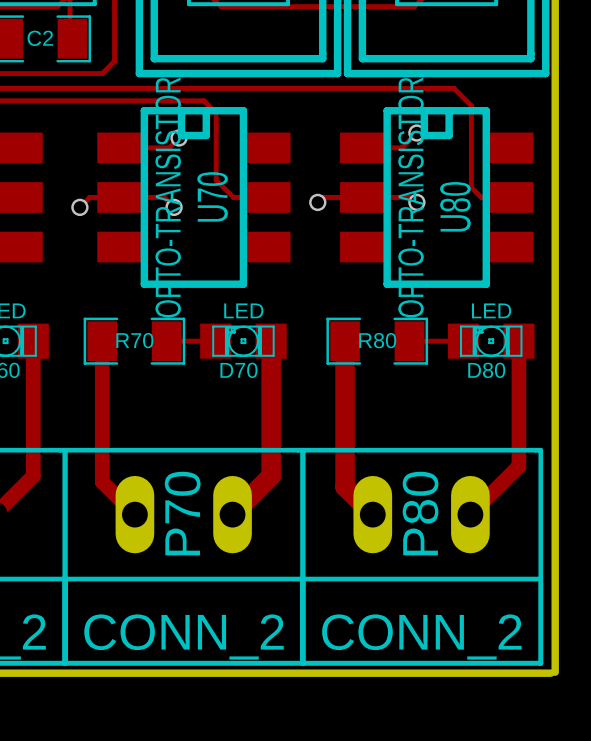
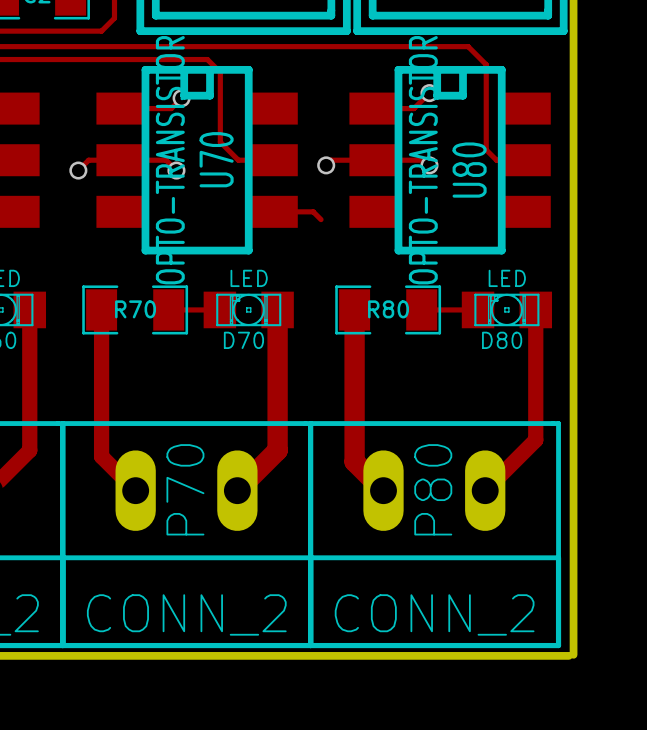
track: none -> (274, 211) (313, 211) (321, 219)

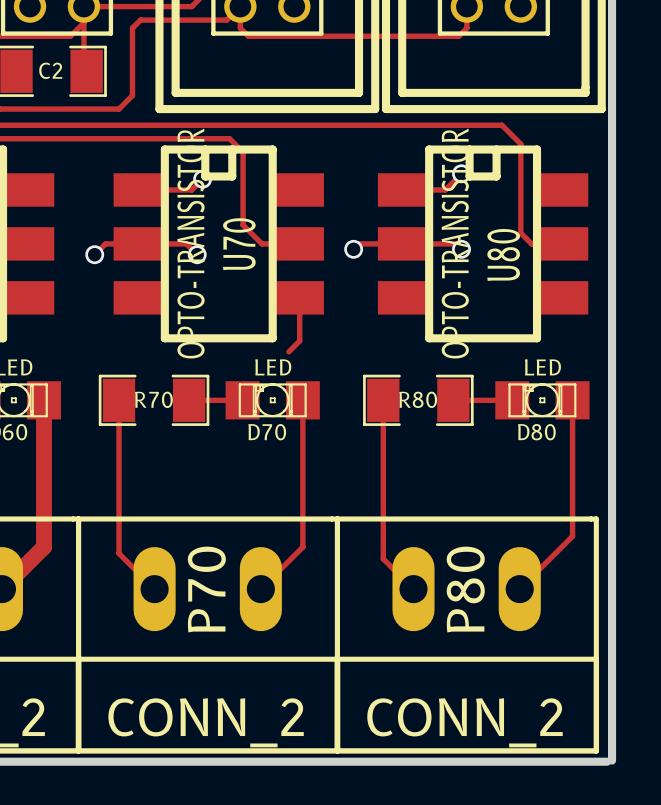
track: (274, 211) (313, 211) (321, 219) -> (299, 297) (299, 341) (288, 351)
track width: thick (101, 309) (101, 456) (135, 490) -> thin (119, 400) (119, 553) (154, 589)
track width: thick (277, 309) (277, 450) (237, 490) -> thin (302, 400) (302, 547) (260, 589)
track width: thick (354, 309) (354, 461) (383, 490) -> thin (383, 400) (383, 558) (413, 589)
track width: thick (535, 309) (535, 440) (485, 490) -> thin (572, 400) (572, 536) (519, 589)

